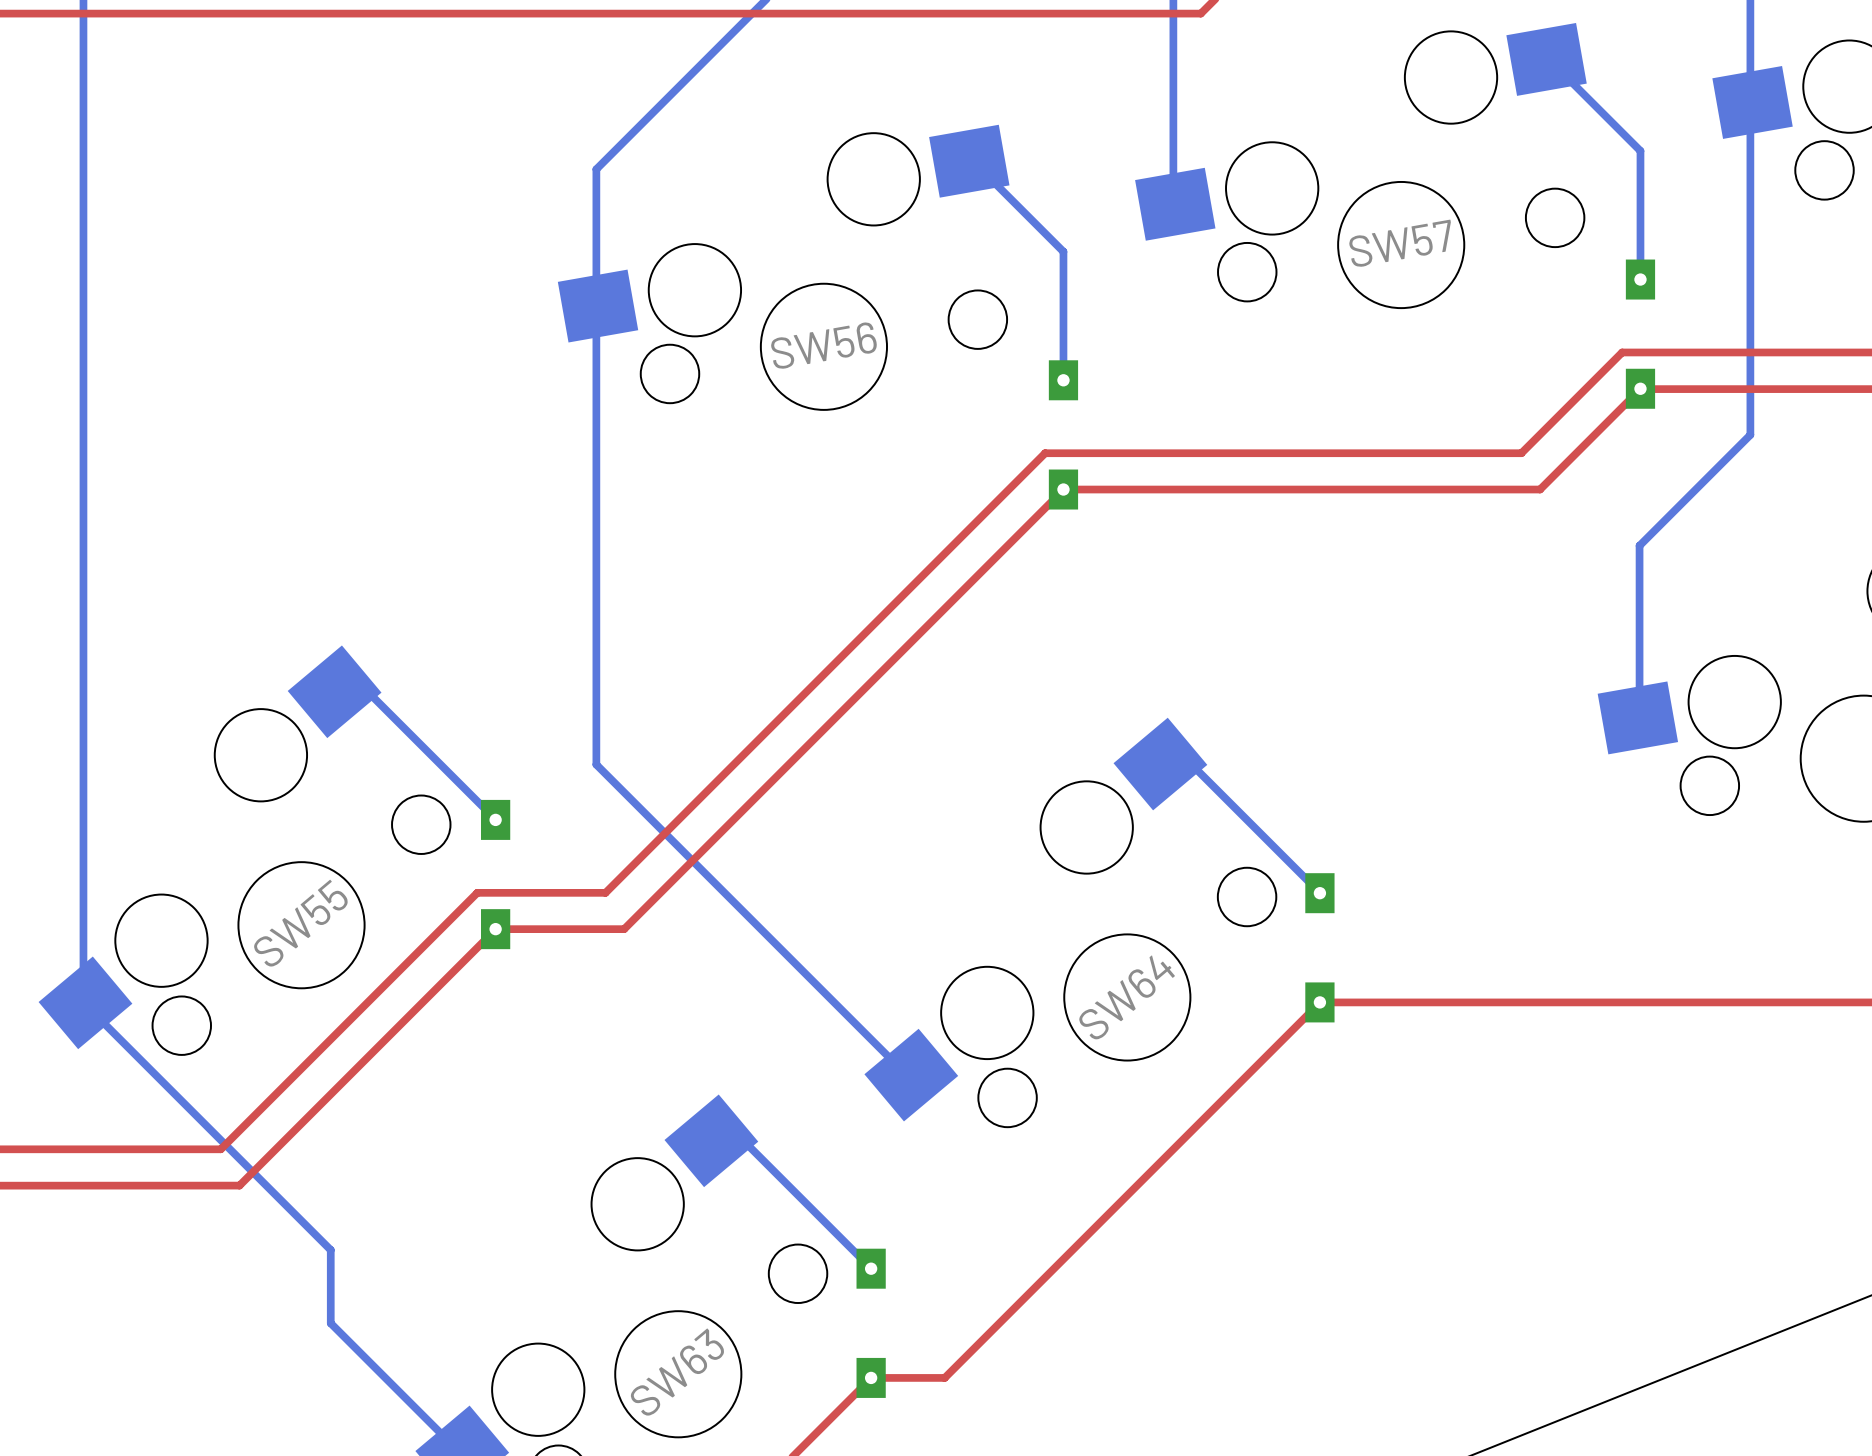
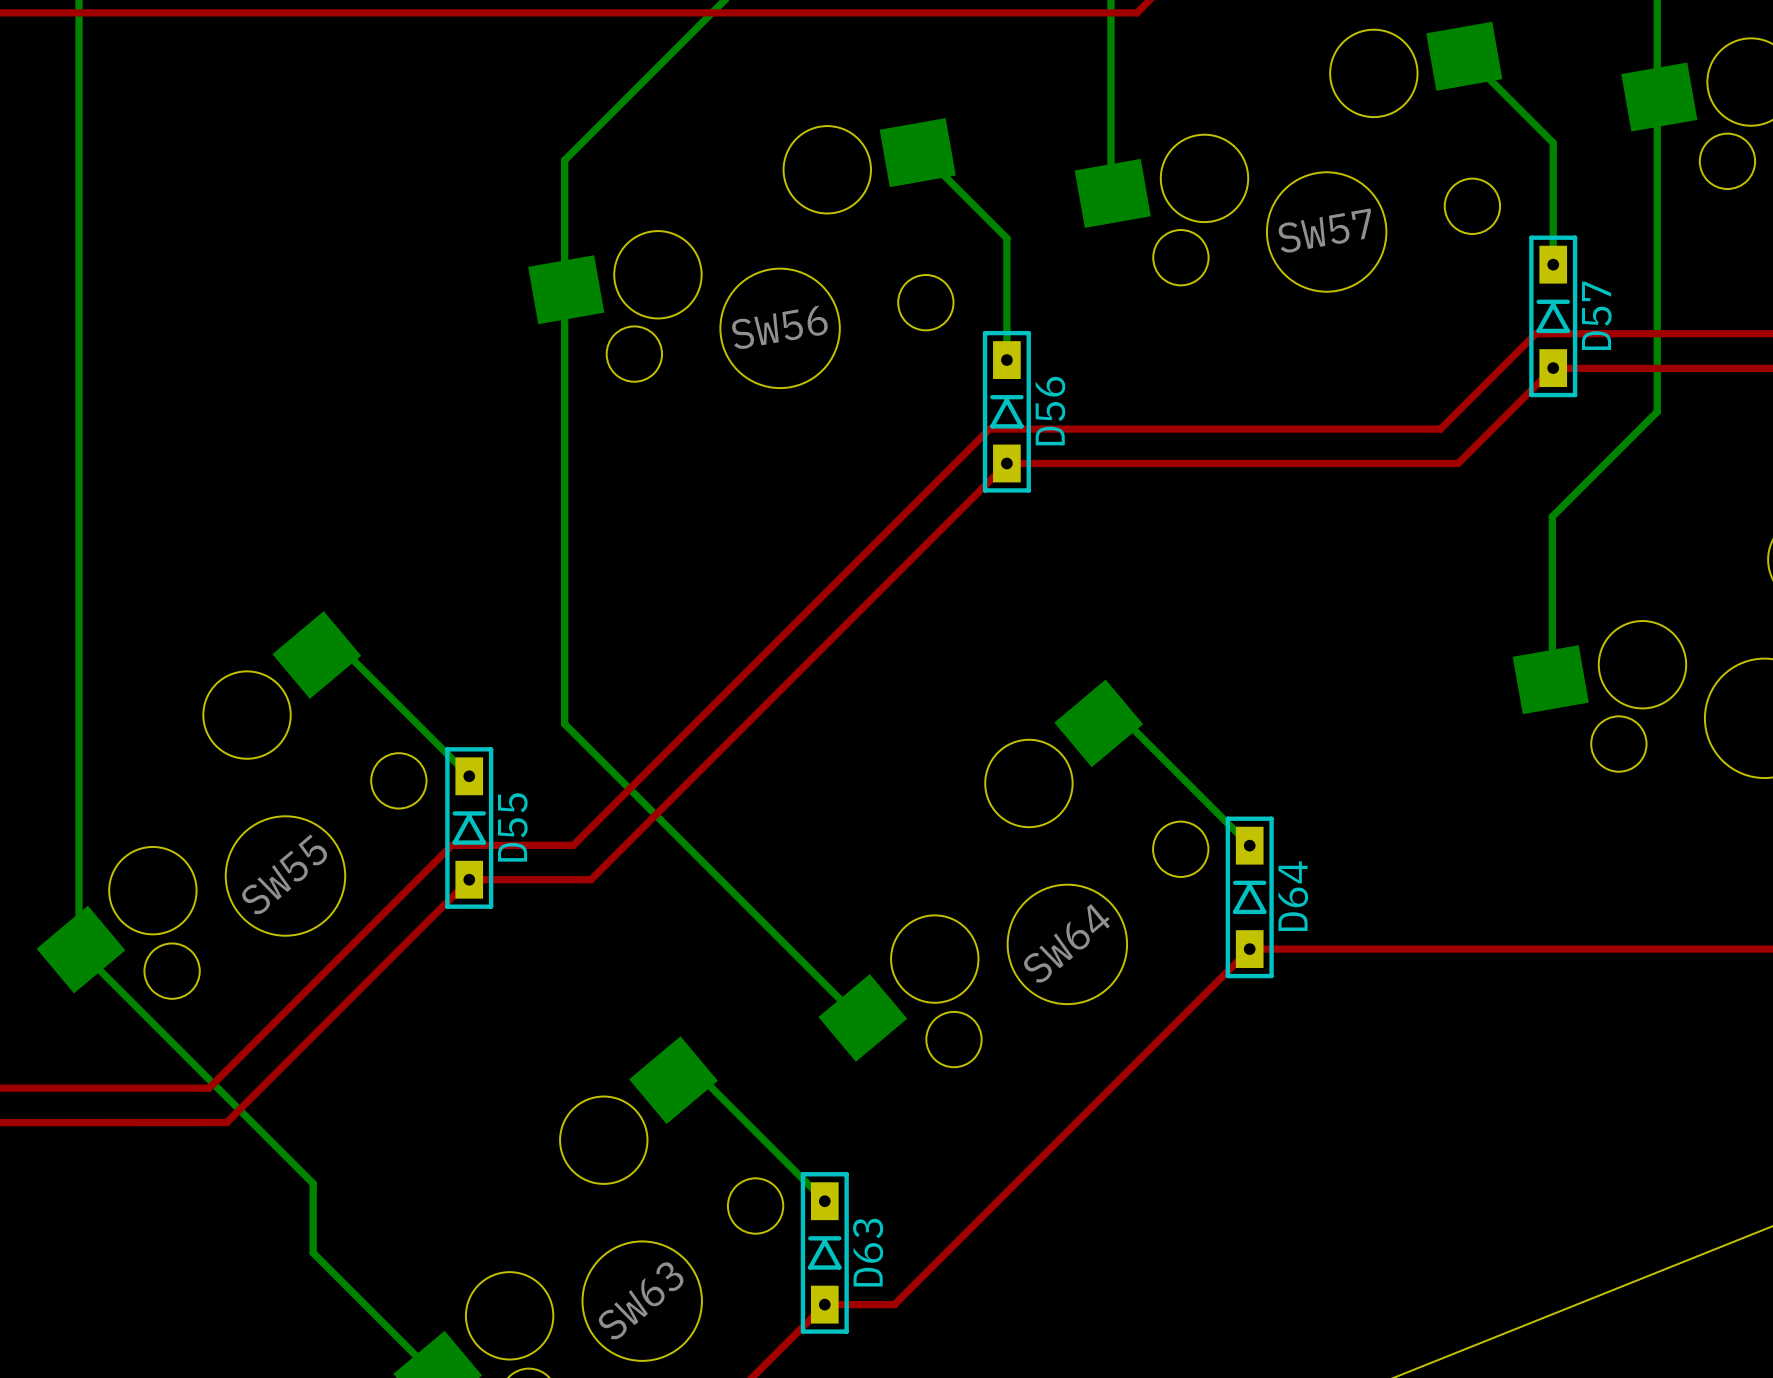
D57: none -> (1553, 316)
D56: none -> (1006, 411)
D55: none -> (469, 828)
D64: none -> (1249, 897)
D63: none -> (824, 1252)

